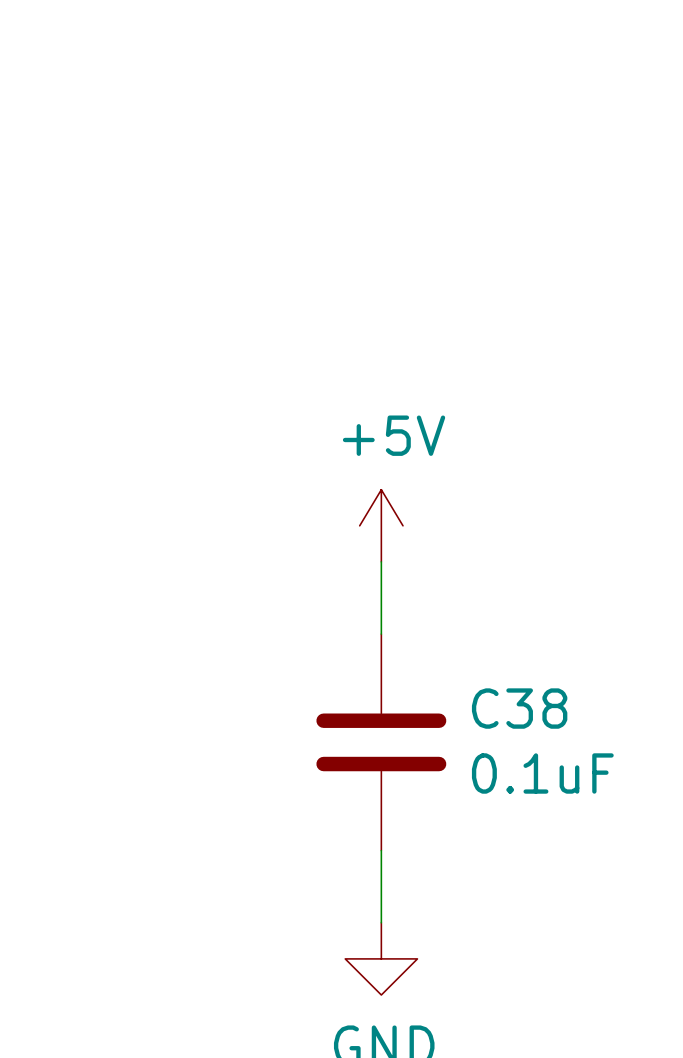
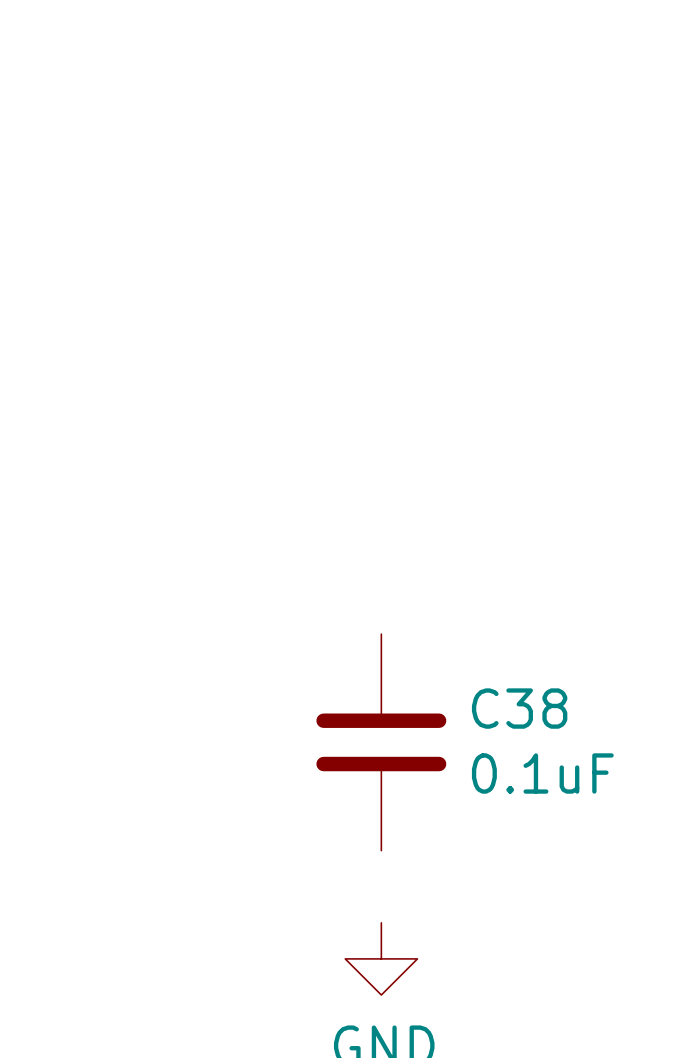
power symbol: +5V (381, 525) -> none
wire: (381, 561) (381, 634) -> none
wire: (381, 850) (381, 922) -> none

